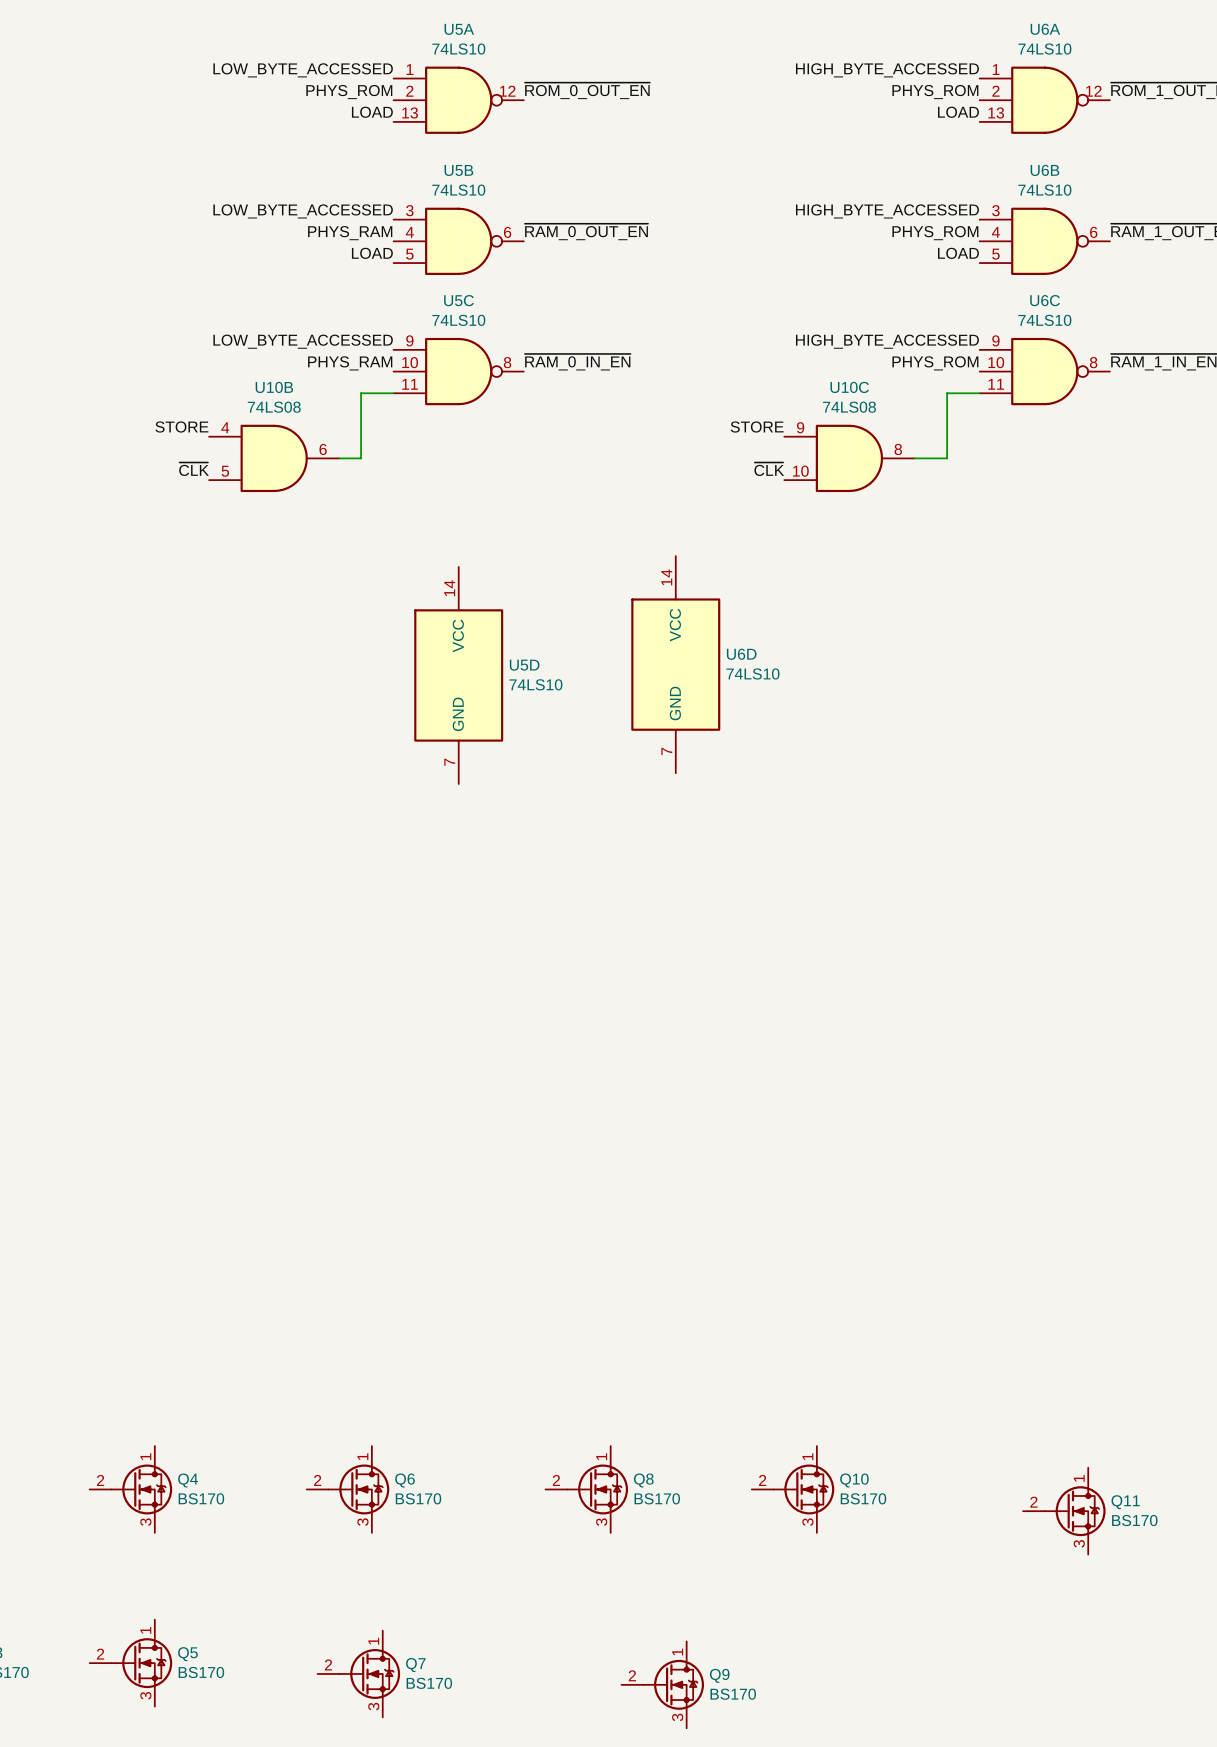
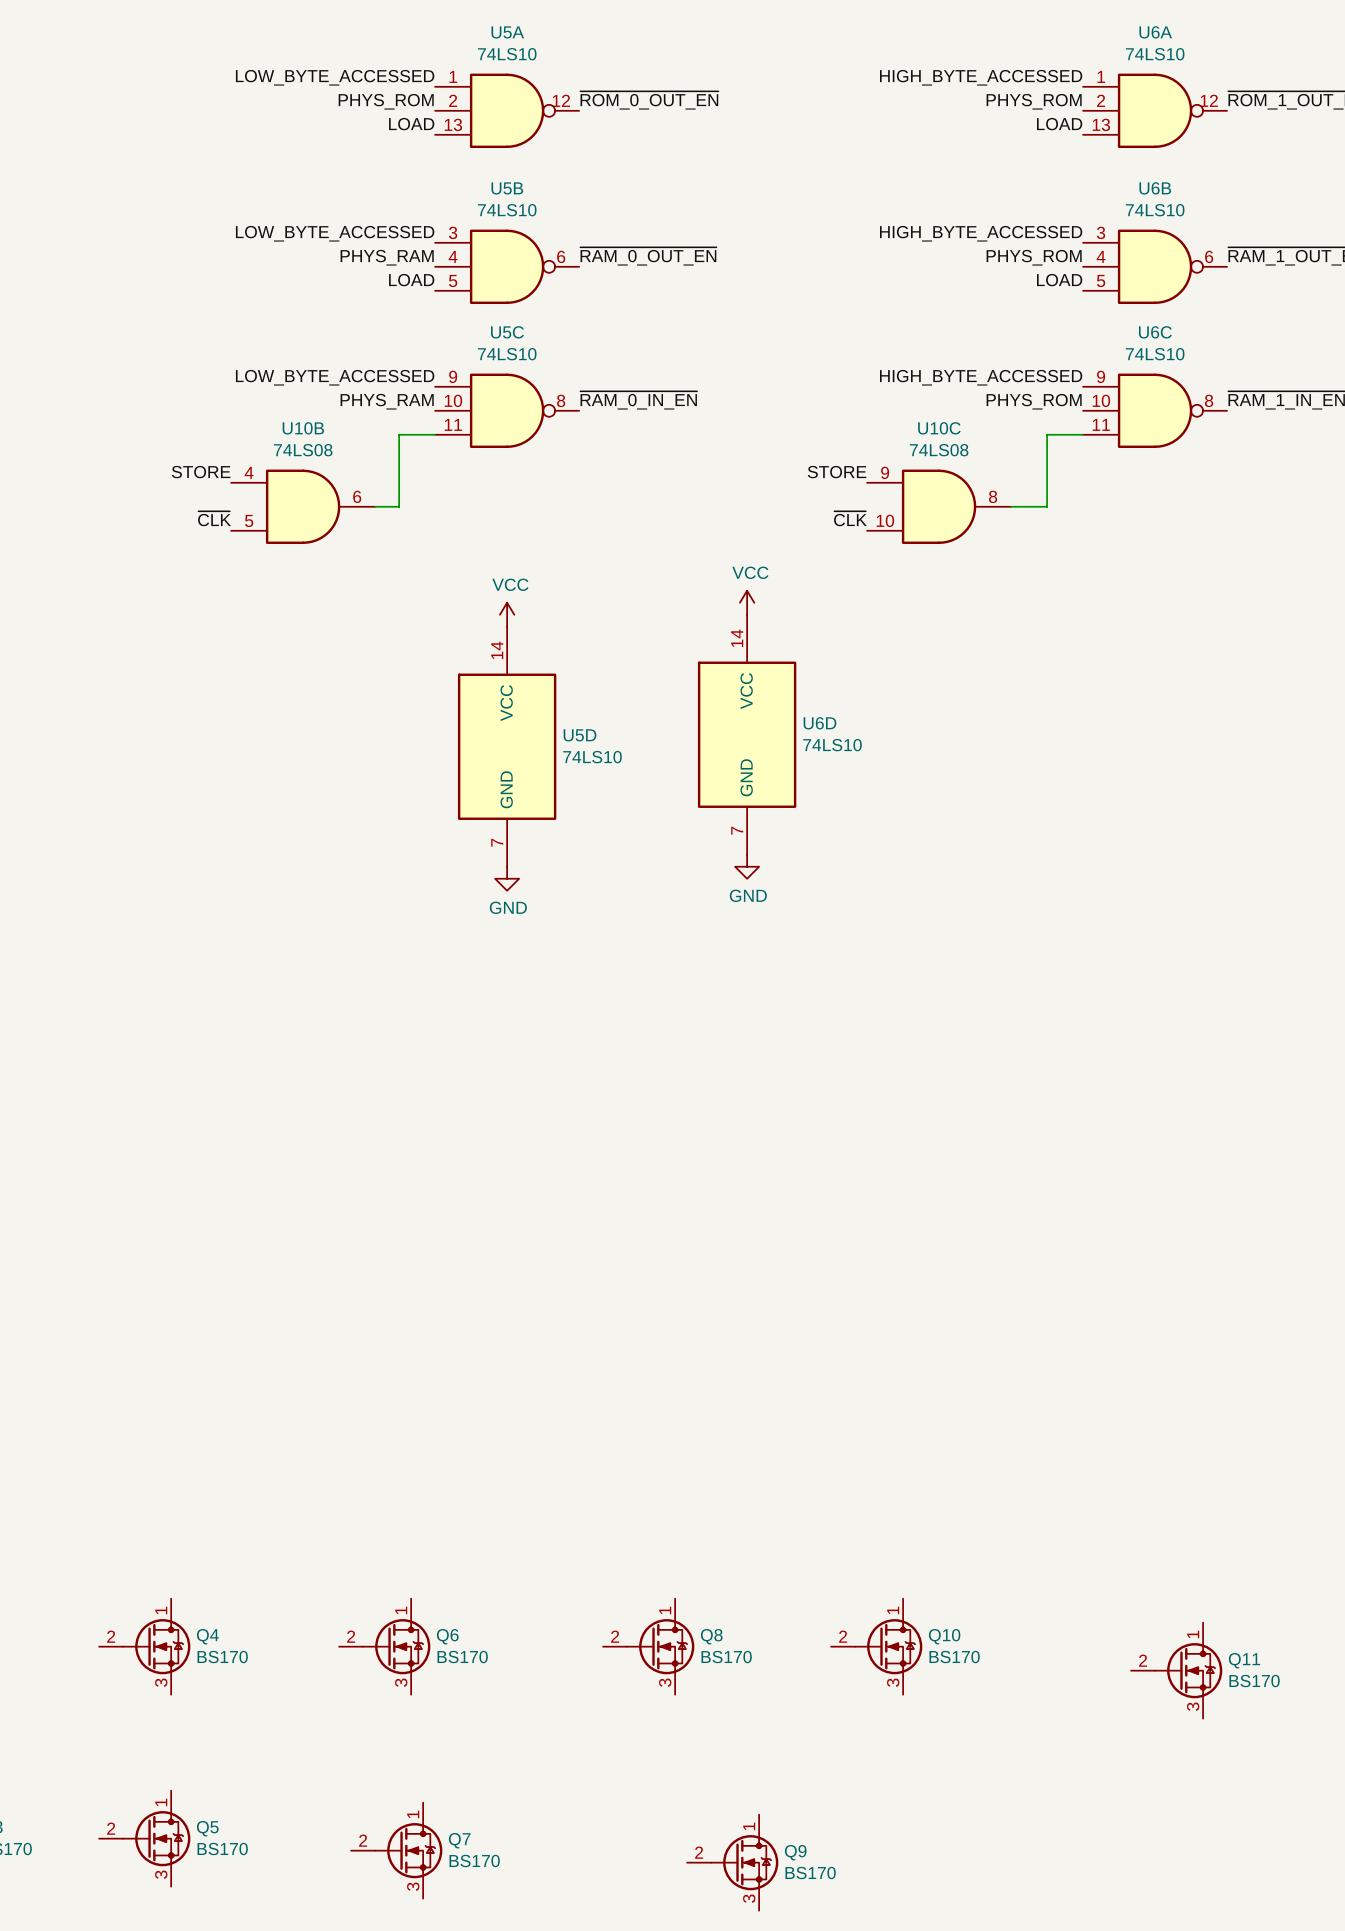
power symbol: none -> VCC (747, 602)
power symbol: none -> VCC (507, 614)
power symbol: none -> GND (747, 866)
power symbol: none -> GND (507, 878)

